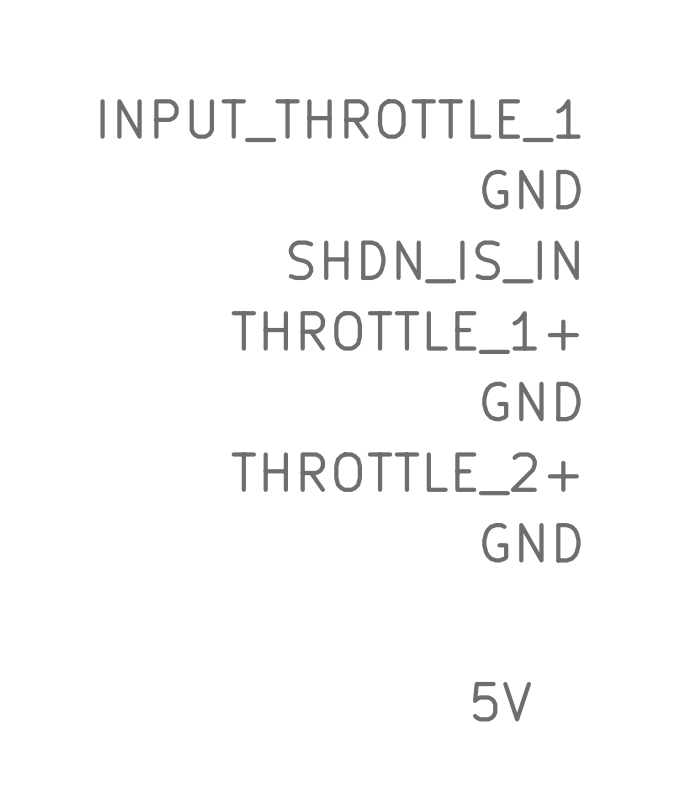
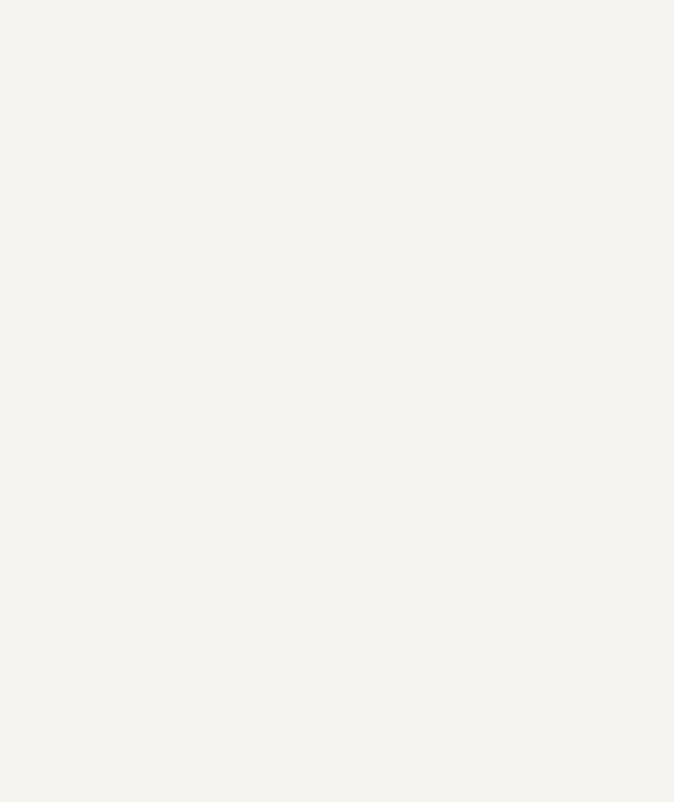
label: INPUT_THROTTLE_1 (340, 120) -> none
label: GND (531, 189) -> none
label: SHDN_IS_IN (433, 261) -> none
label: THROTTLE_1+ (405, 332) -> none
label: GND (531, 401) -> none
label: THROTTLE_2+ (405, 473) -> none
label: GND (531, 542) -> none
label: 5V (501, 701) -> none

